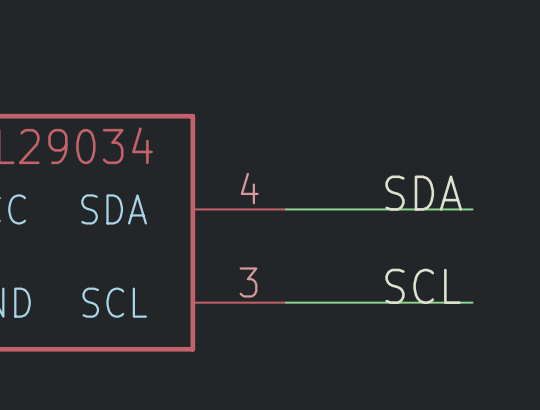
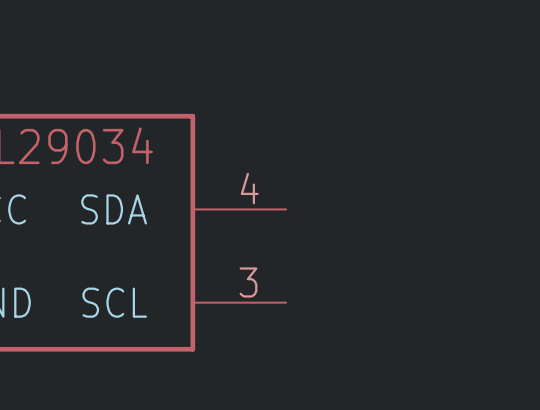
label: SDA (423, 193) -> none
wire: (286, 209) (472, 209) -> none
label: SCL (422, 286) -> none
wire: (286, 302) (472, 302) -> none

